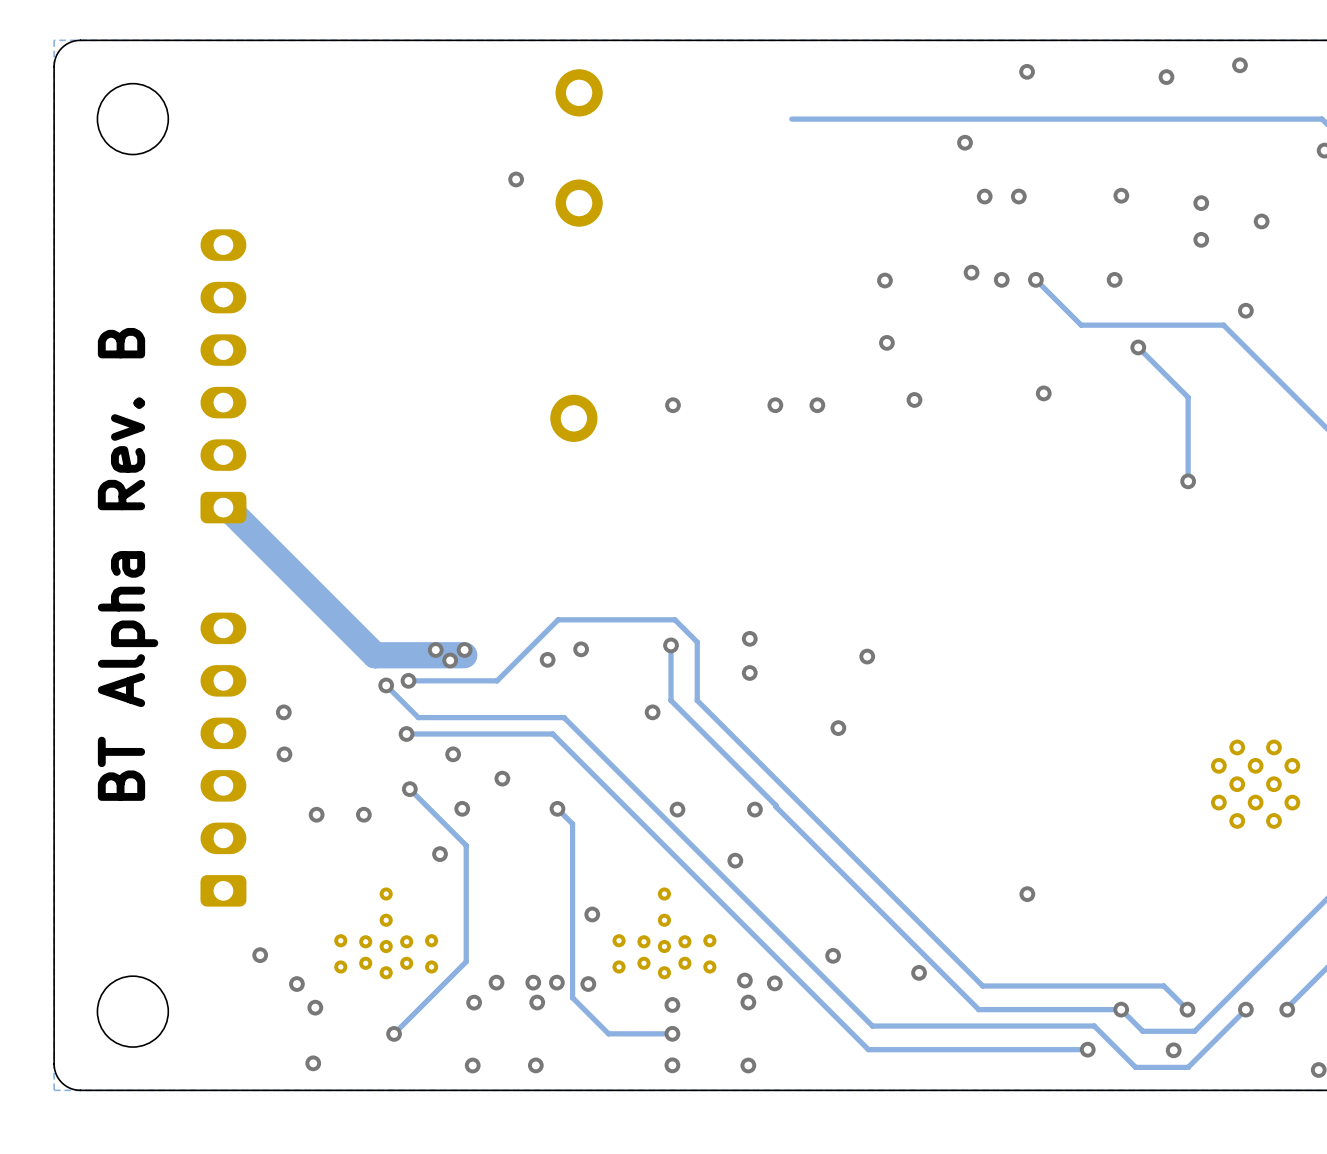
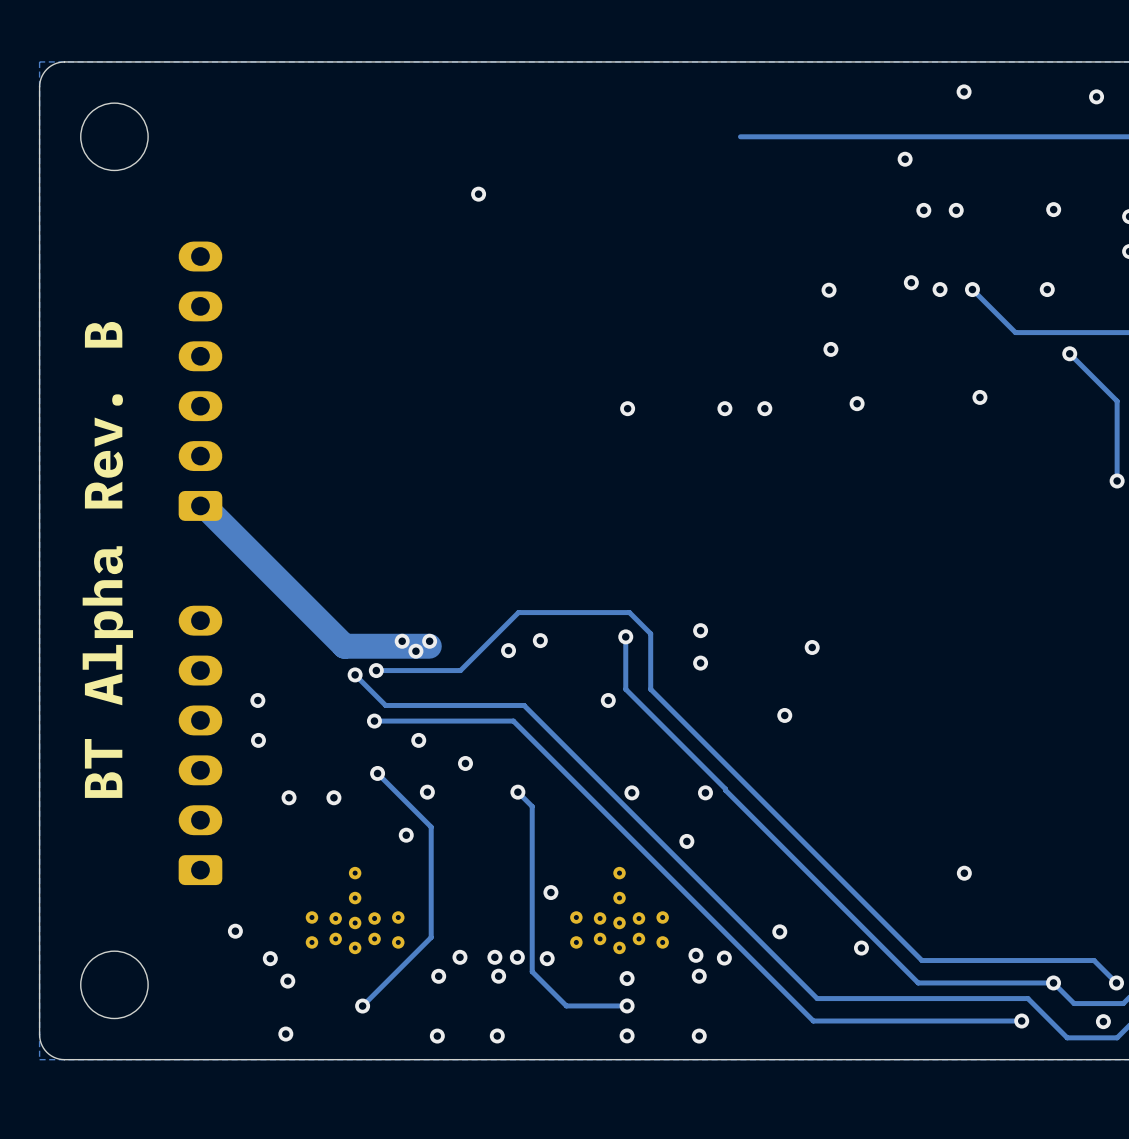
part: (579, 92) -> none
part: (579, 203) -> none
part: (573, 418) -> none

